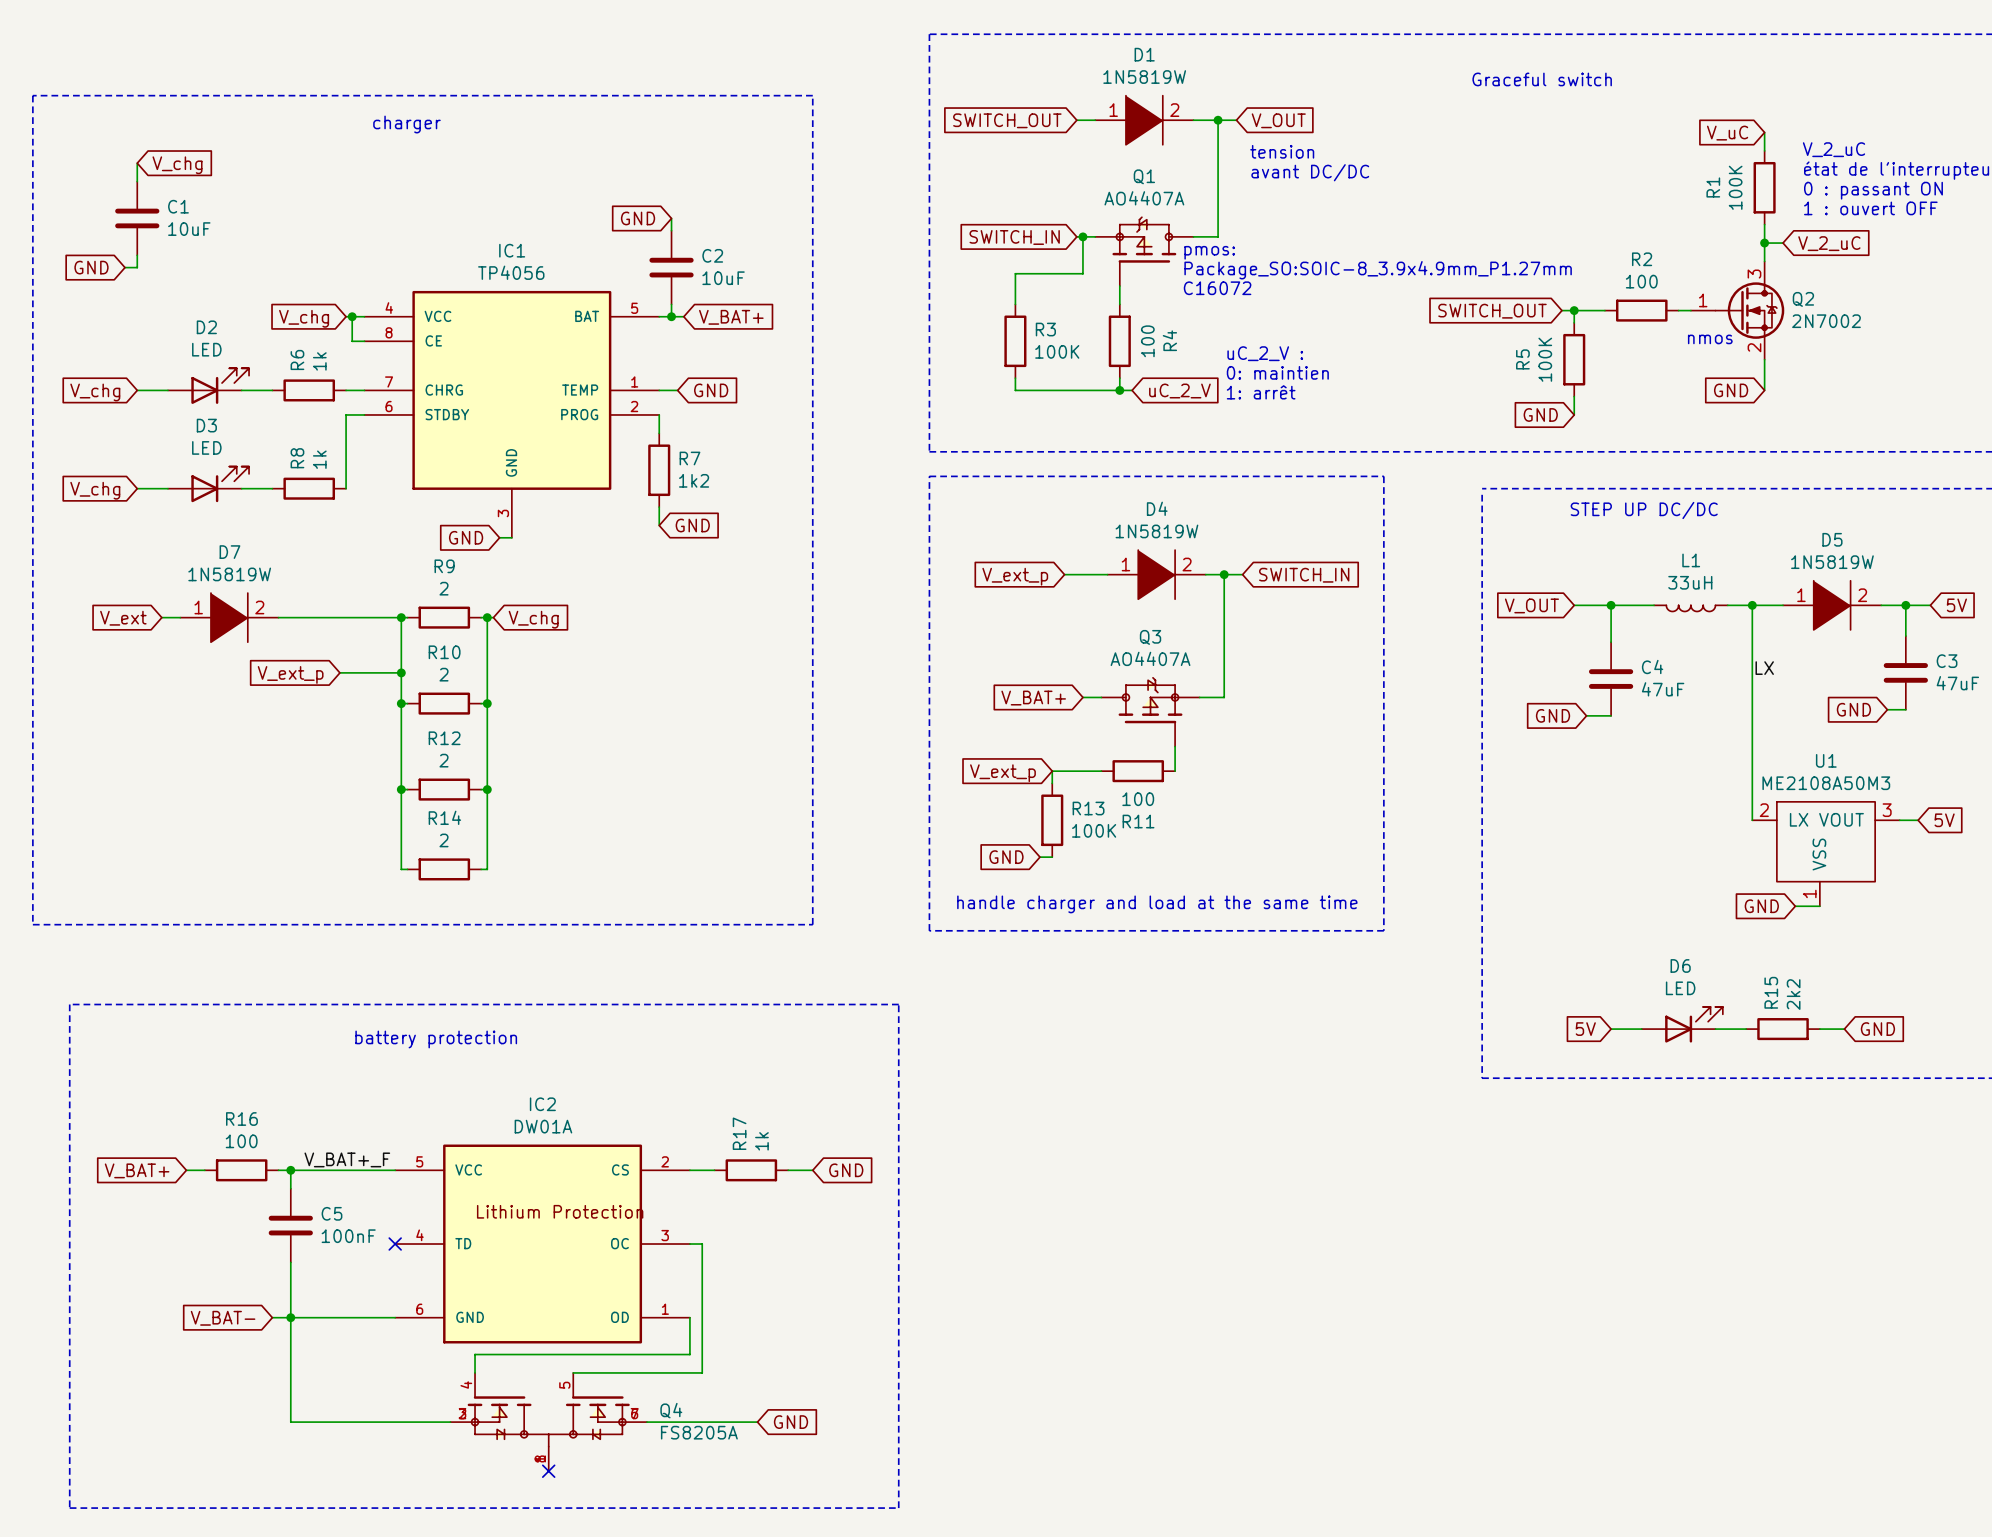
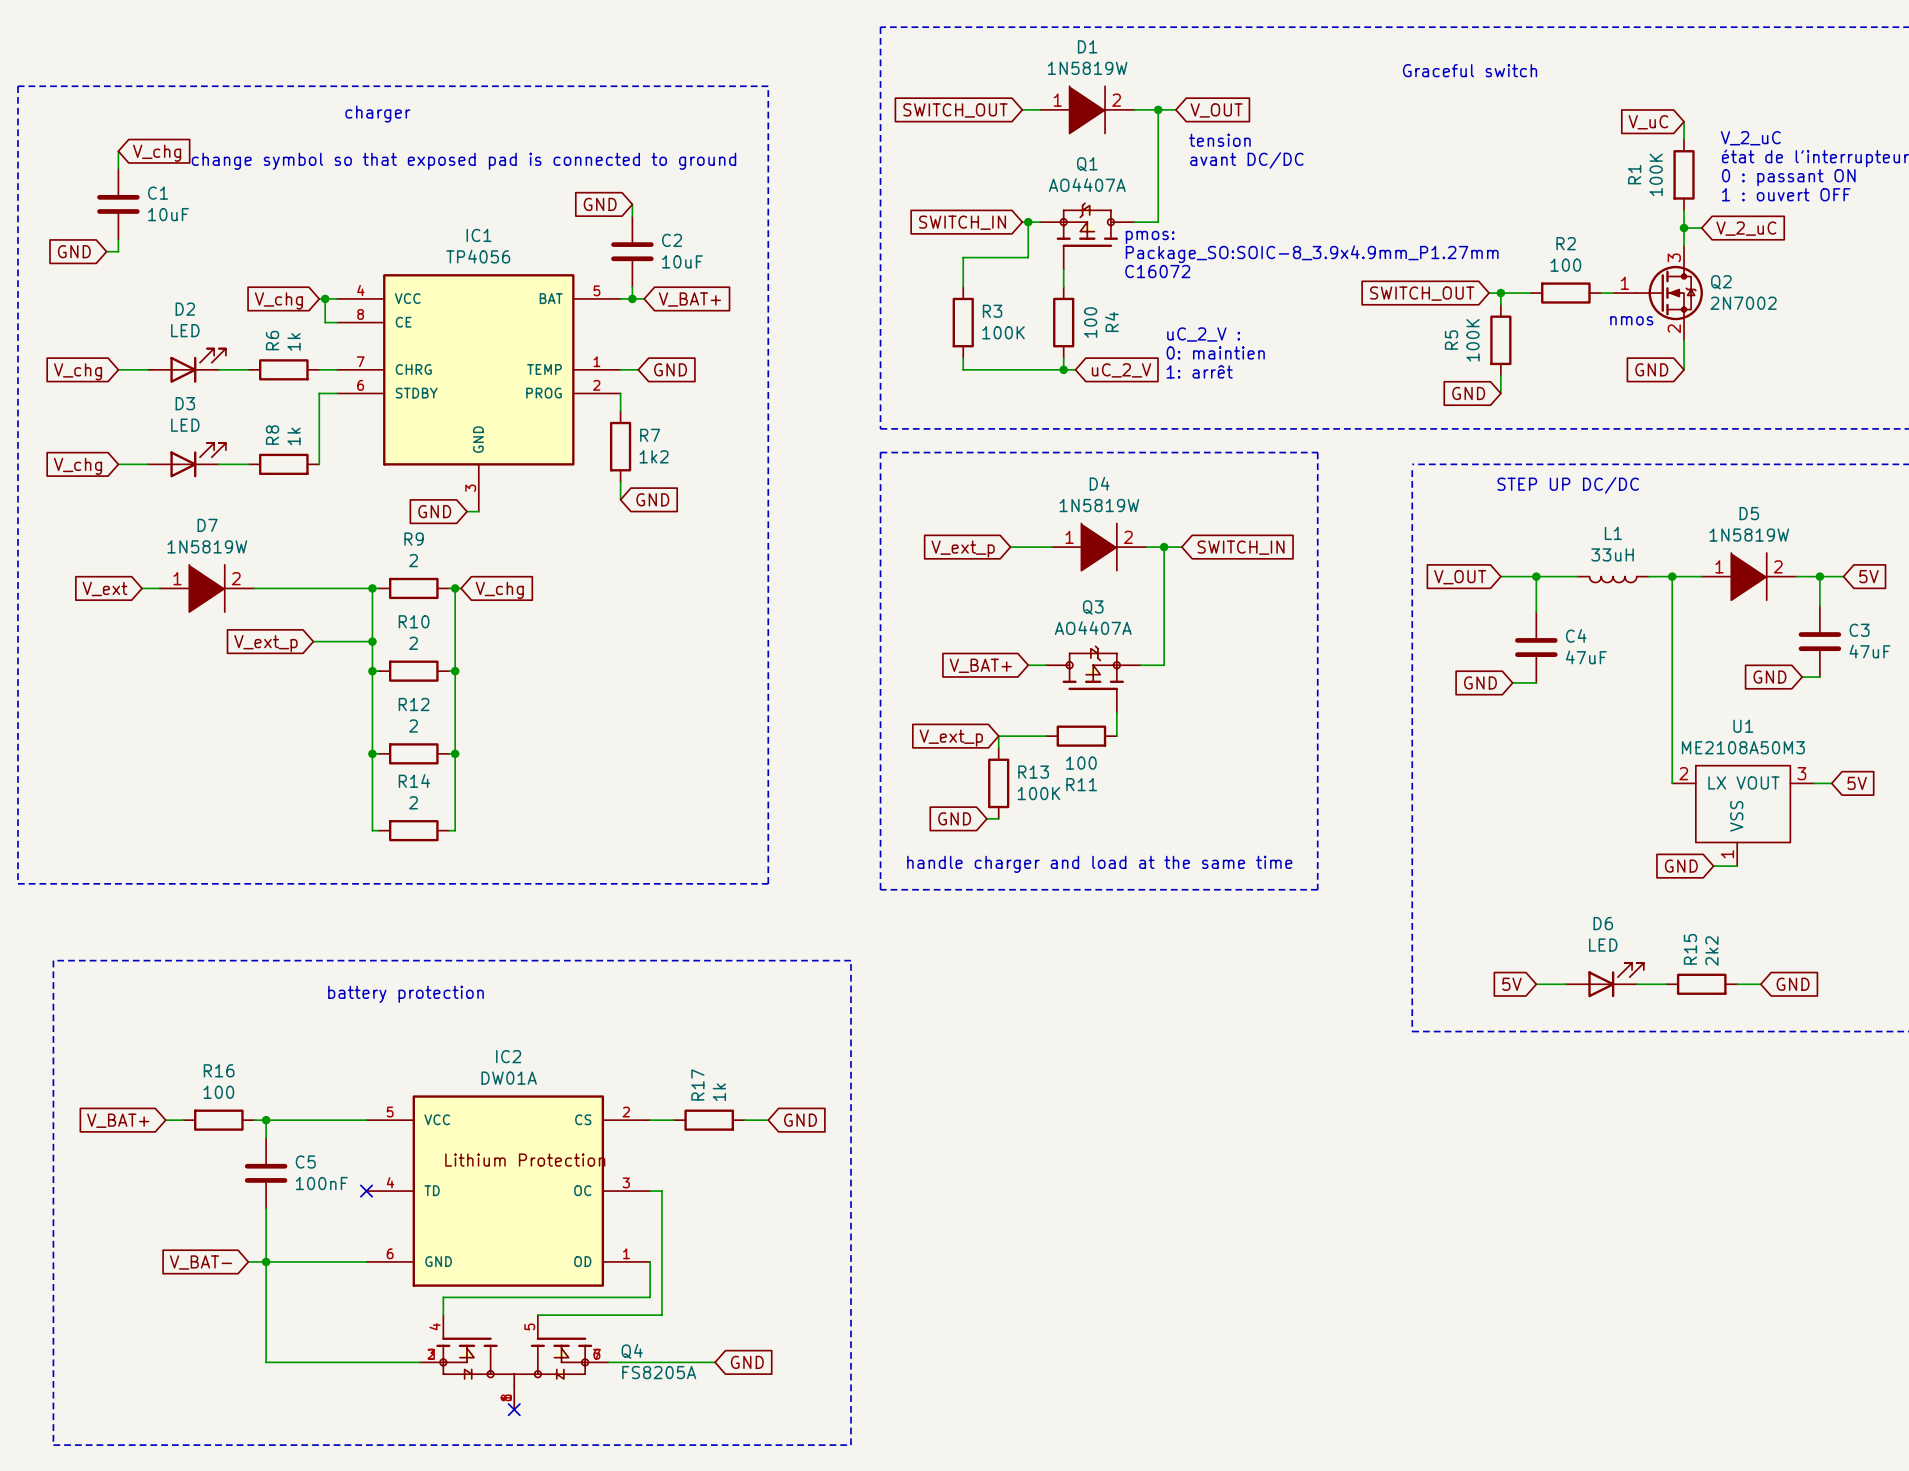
text: none -> change symbol so that exposed pad is connected to ground (463, 161)
label: LX (1764, 668) -> none
label: V_BAT+_F (347, 1159) -> none

